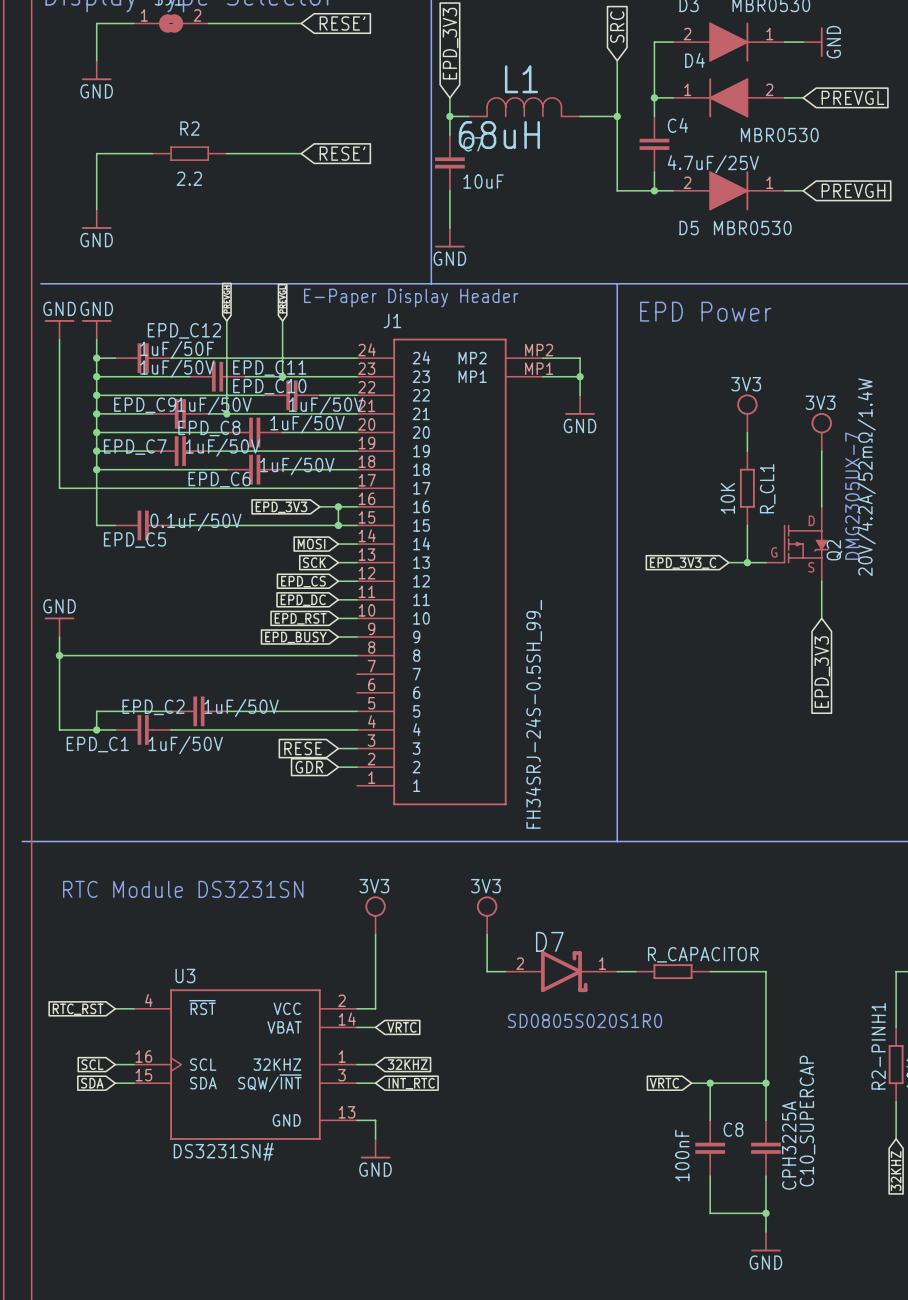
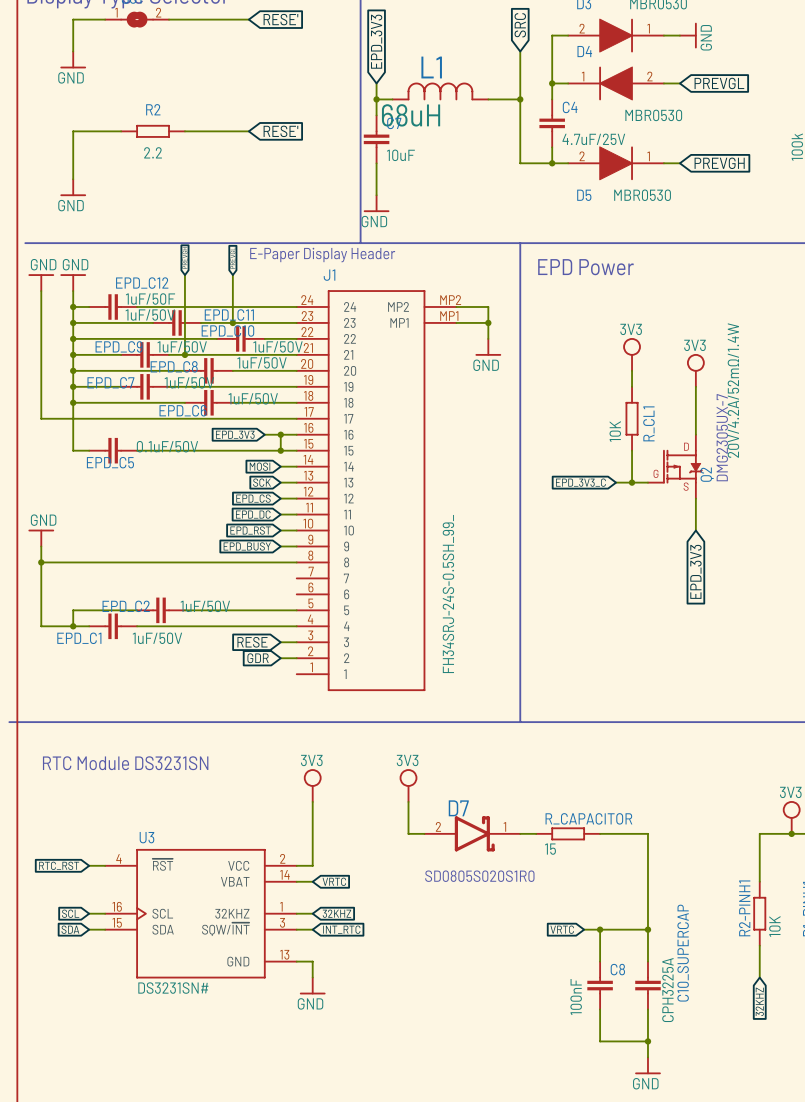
R_CAPACITOR value: none -> 15 (550, 849)

